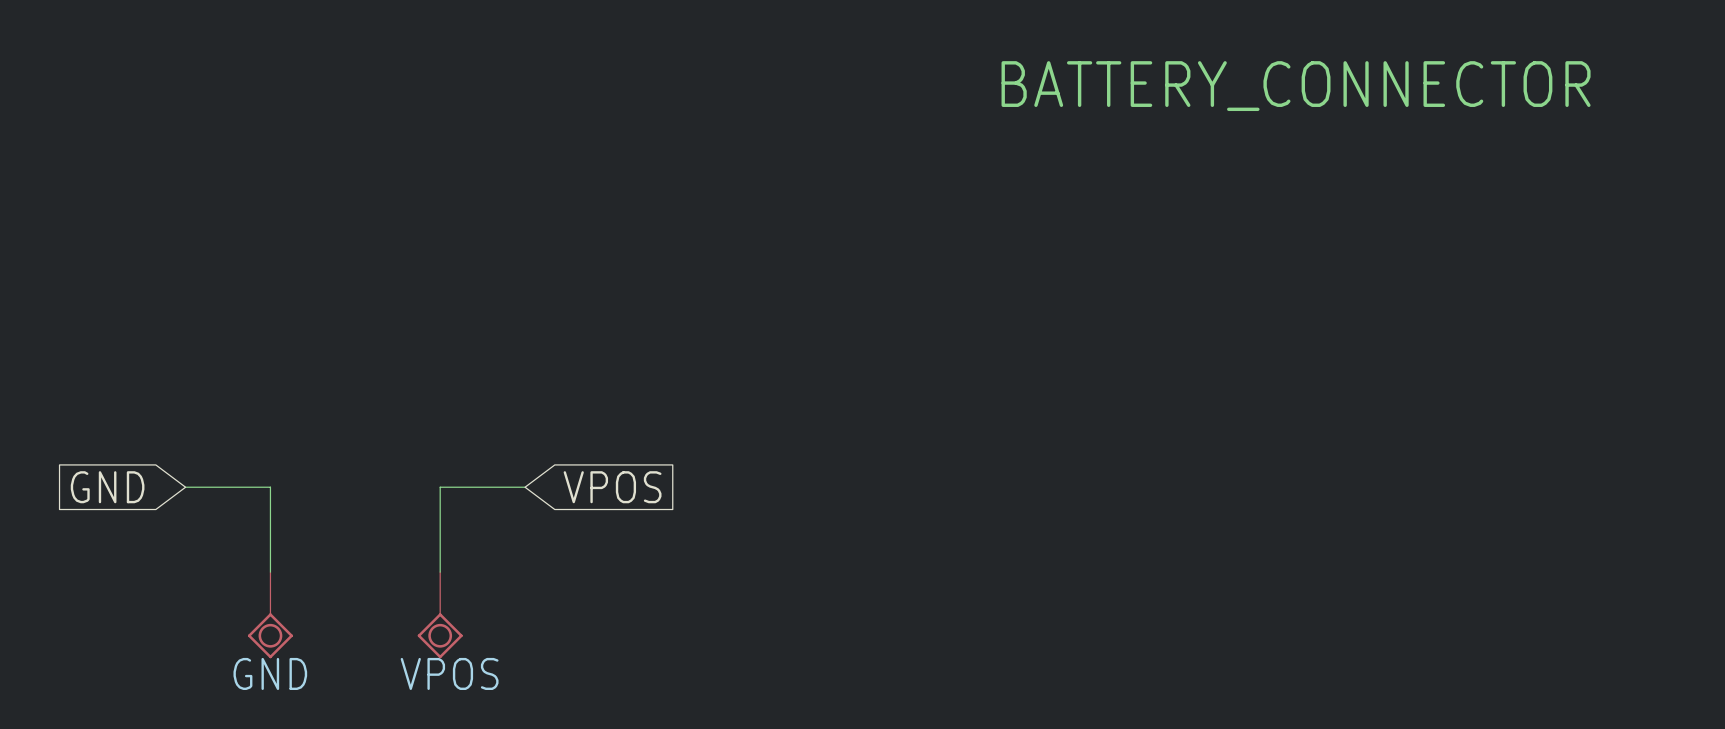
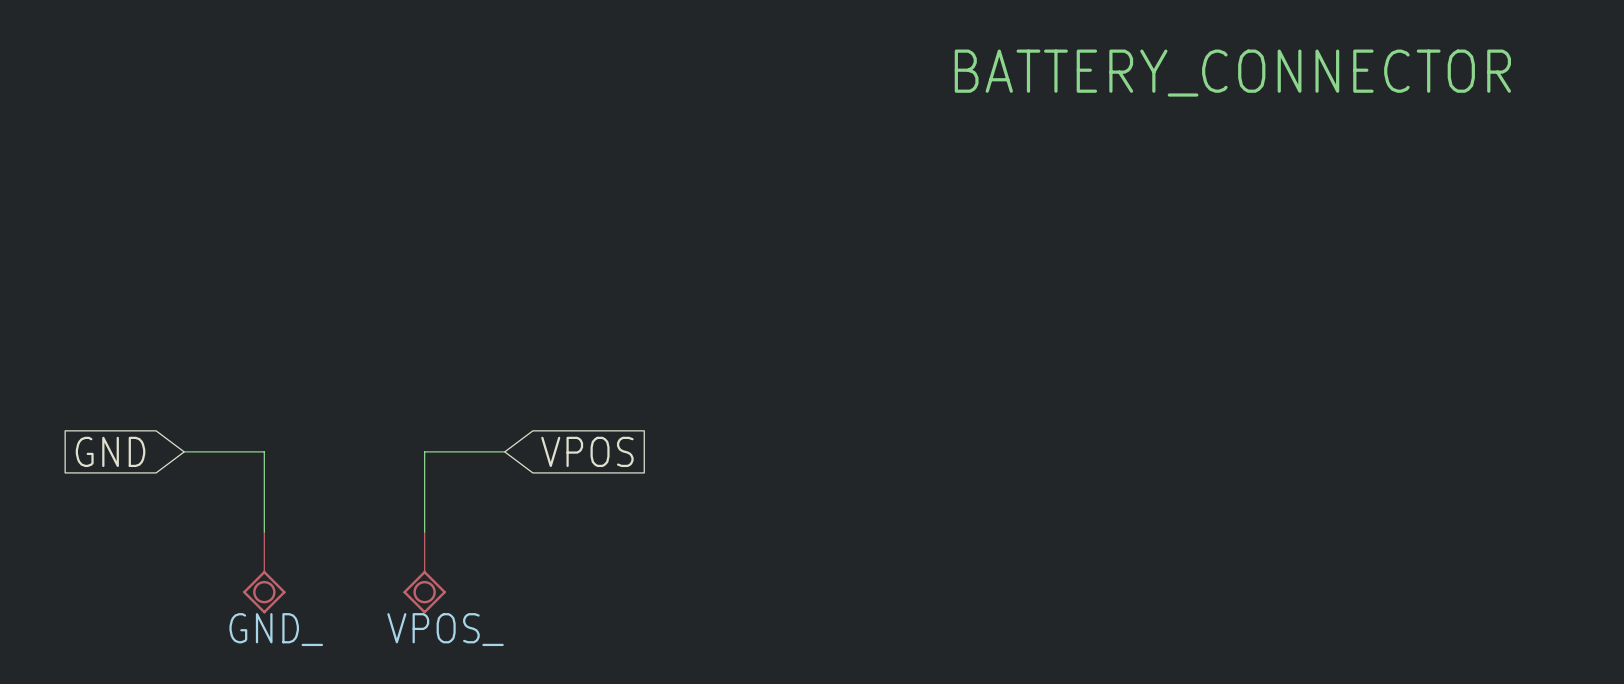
GND name: GND (270, 673) -> GND_ (276, 629)
VPOS name: VPOS (449, 673) -> VPOS_ (445, 629)

